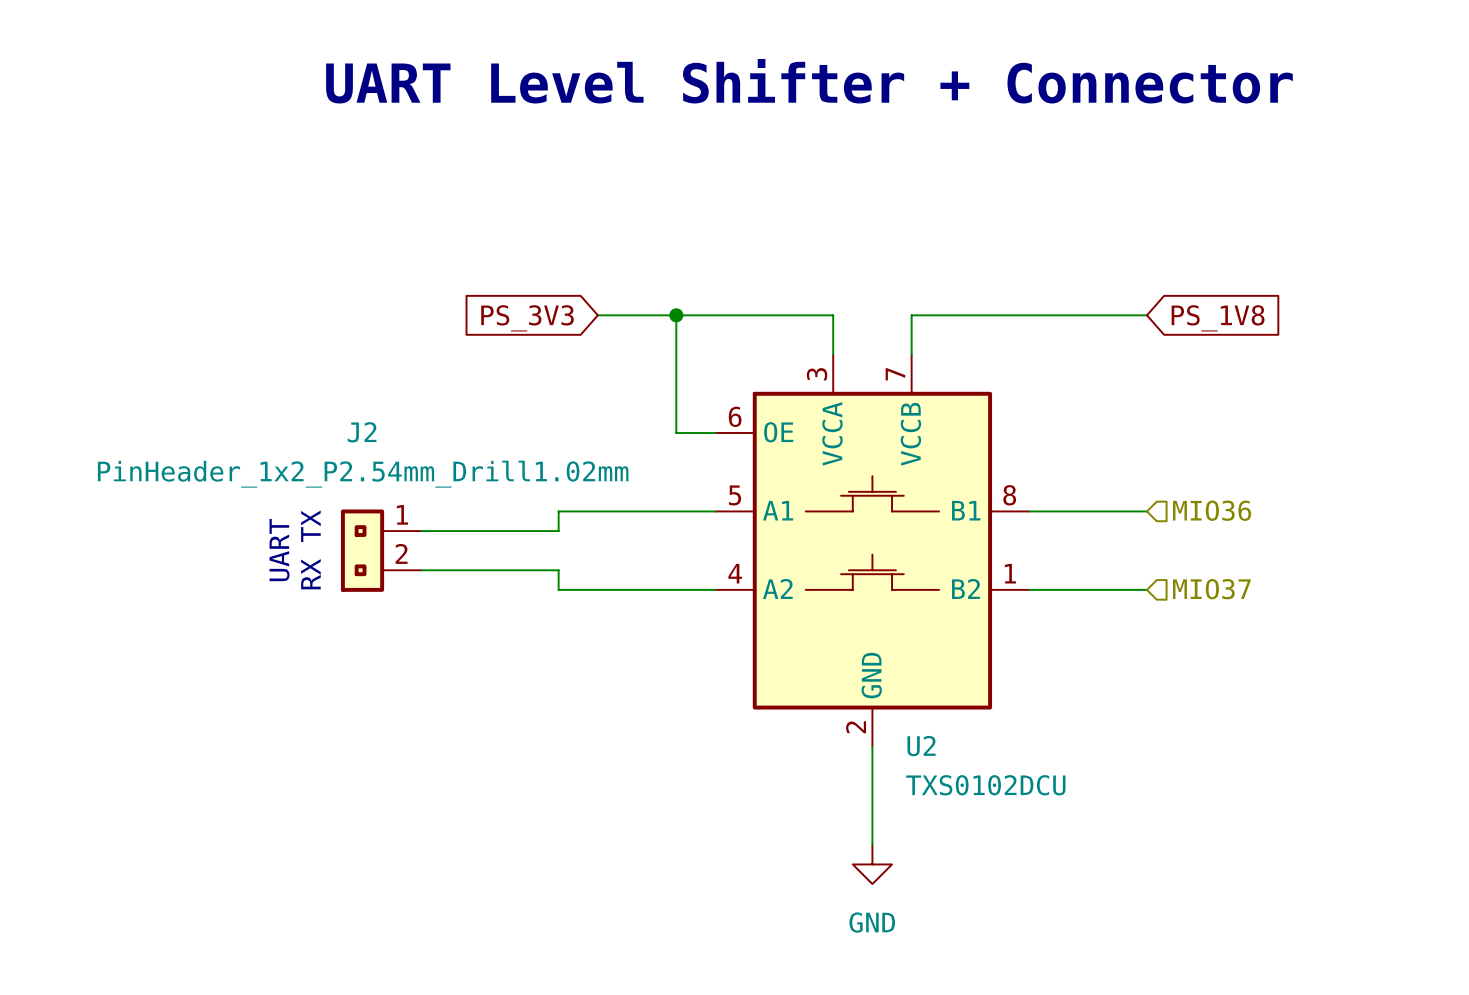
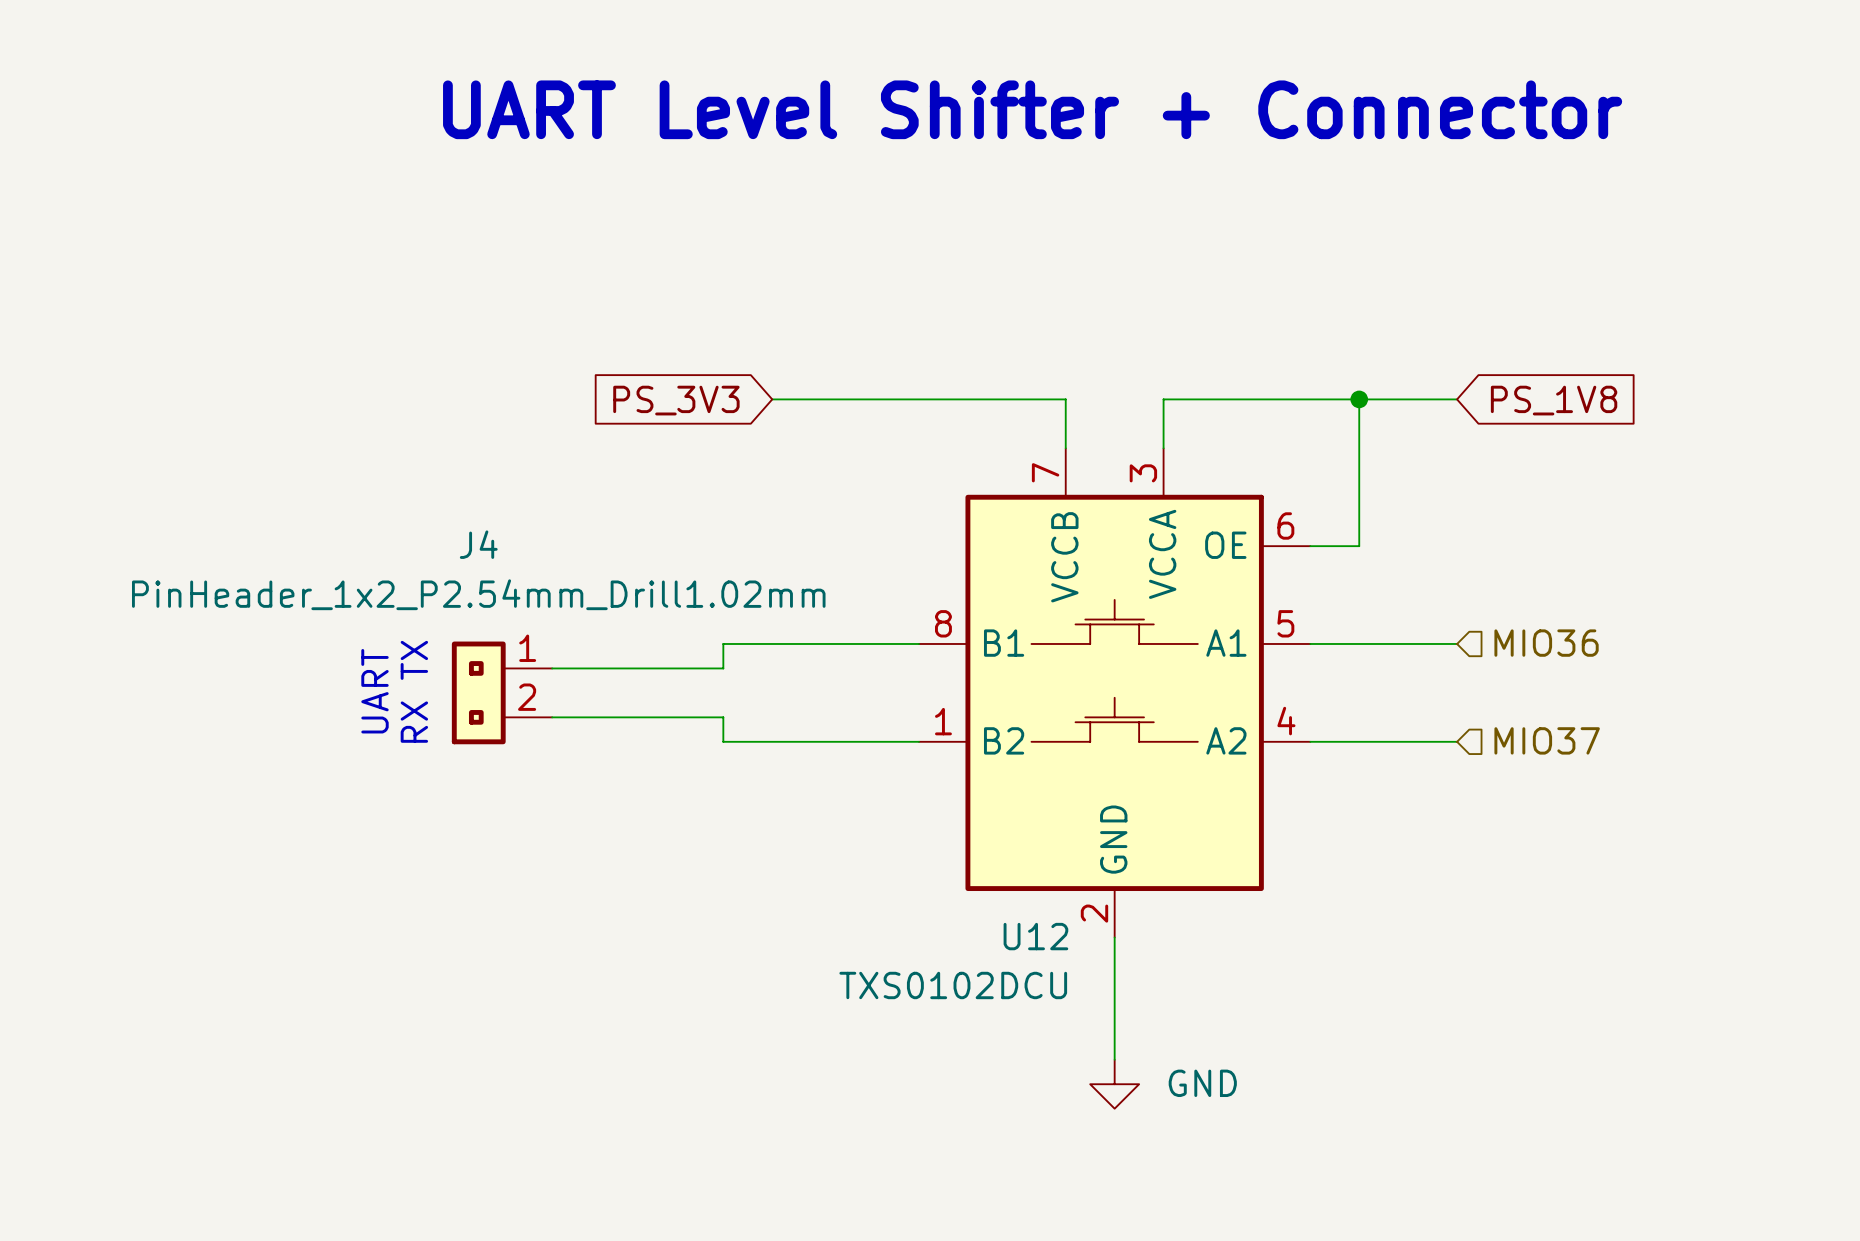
wire: (676, 315) (676, 433) (715, 433) -> none
junction: (676, 315) -> none
wire: none -> (1359, 399) (1359, 546) (1310, 546)
junction: none -> (1359, 399)
J2 name: J2 (362, 432) -> J4 (478, 544)
U2: TXS0102DCU (872, 550) -> none
U12: none -> TXS0102DCU (1114, 692)
power symbol text position: GND (872, 922) -> GND (1202, 1083)

